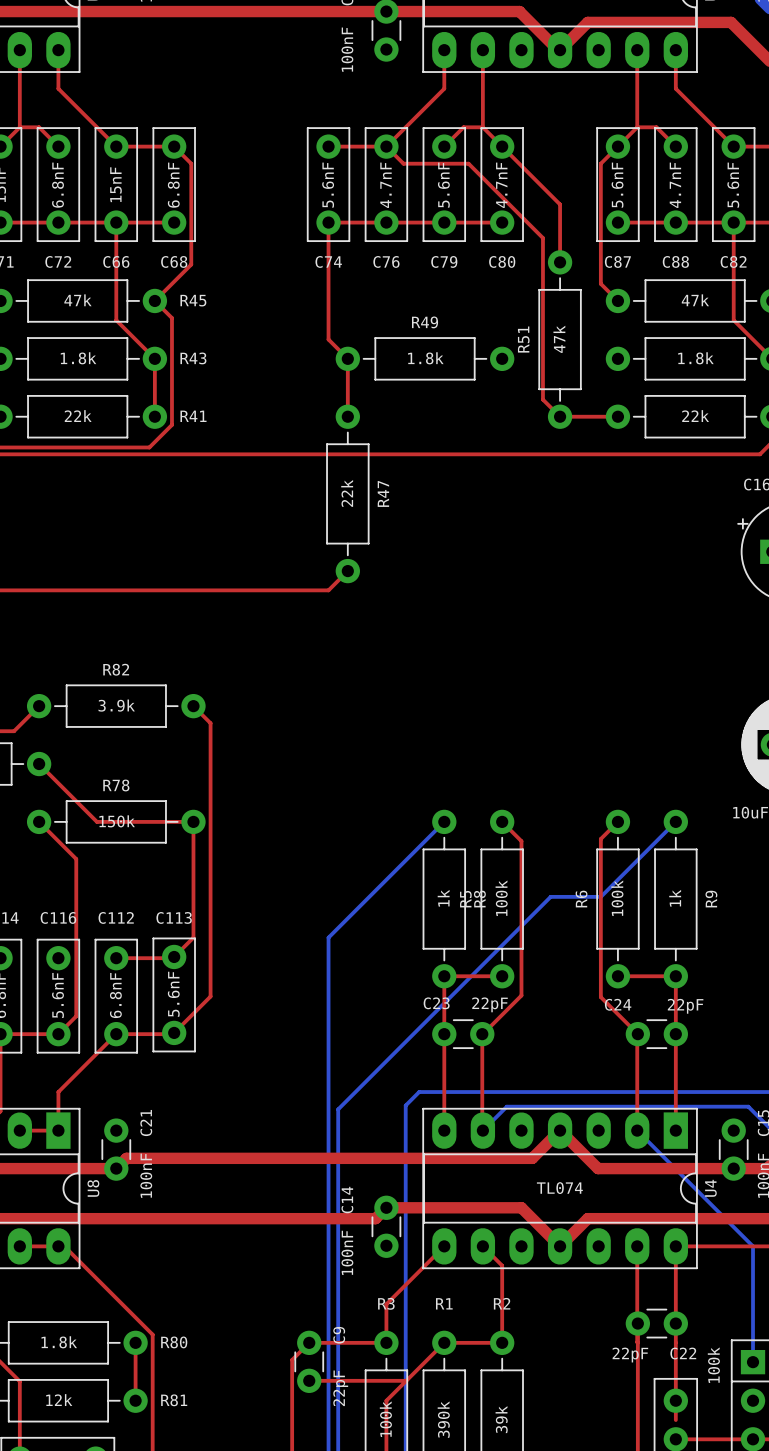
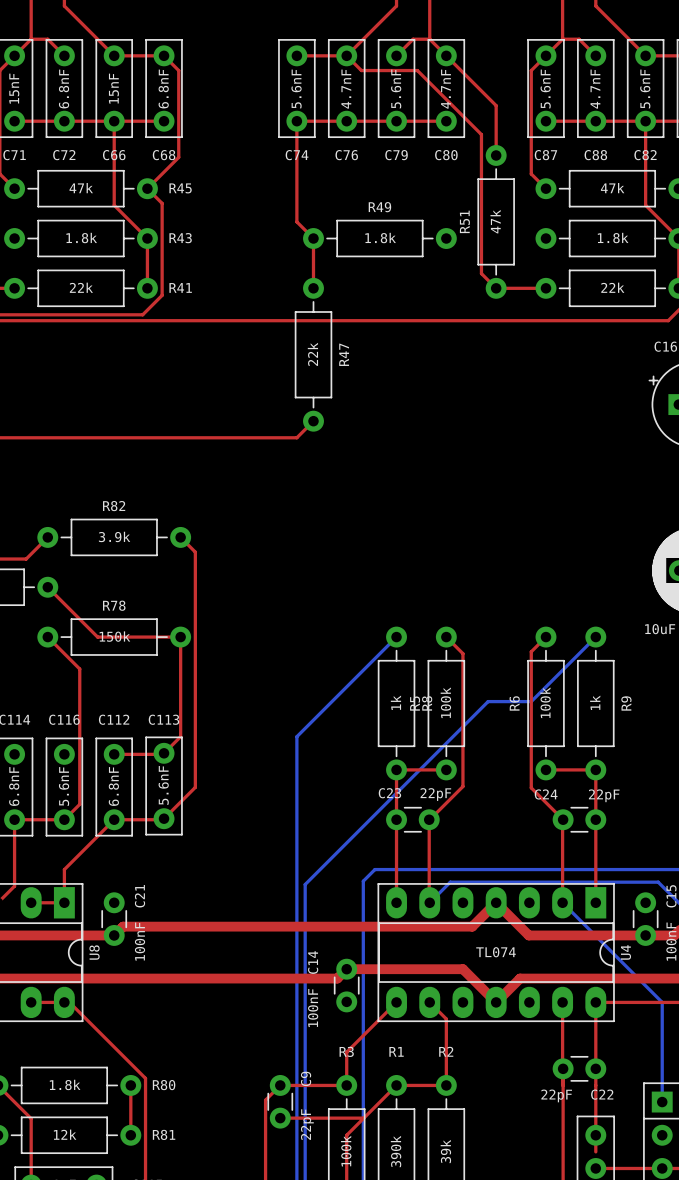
part value: 100k (713, 1365) -> none

